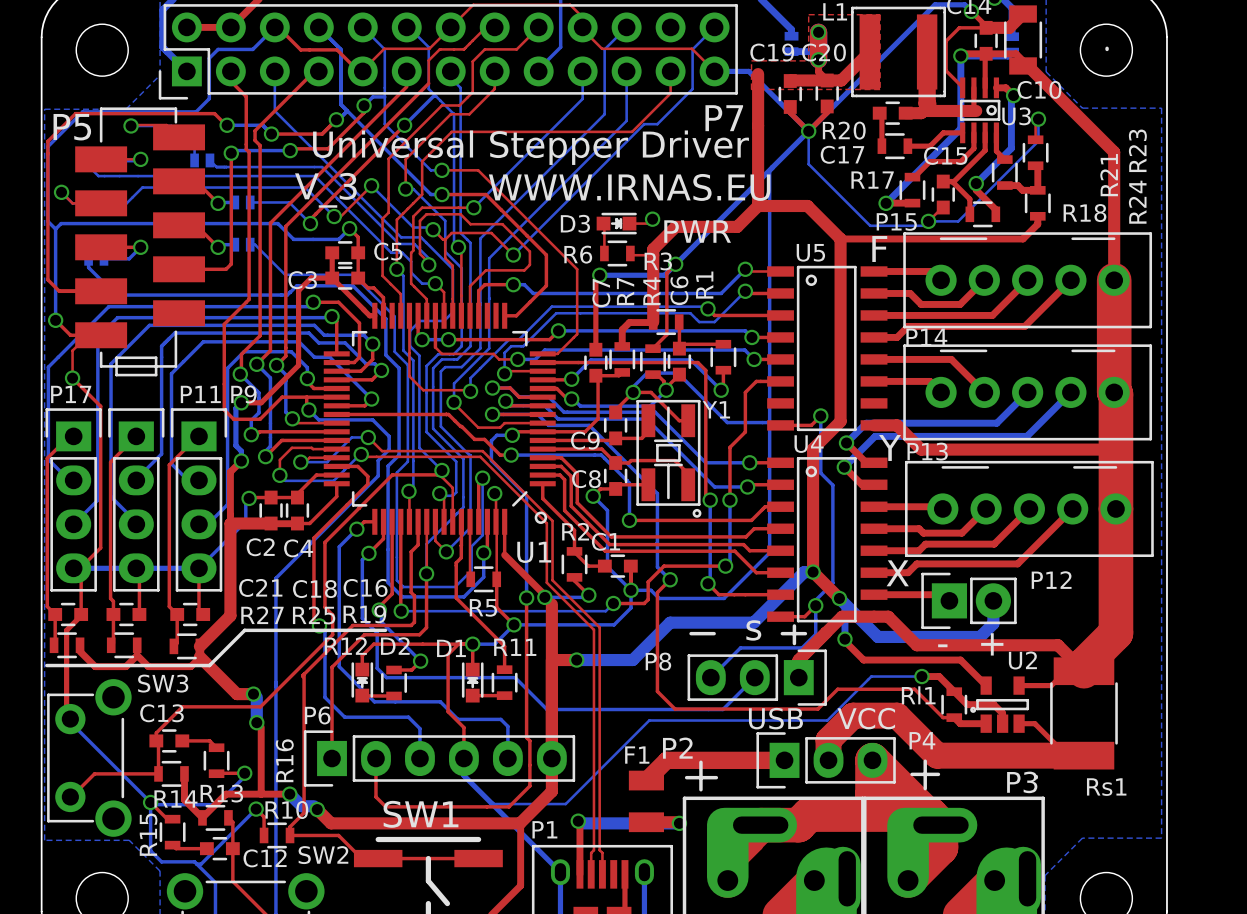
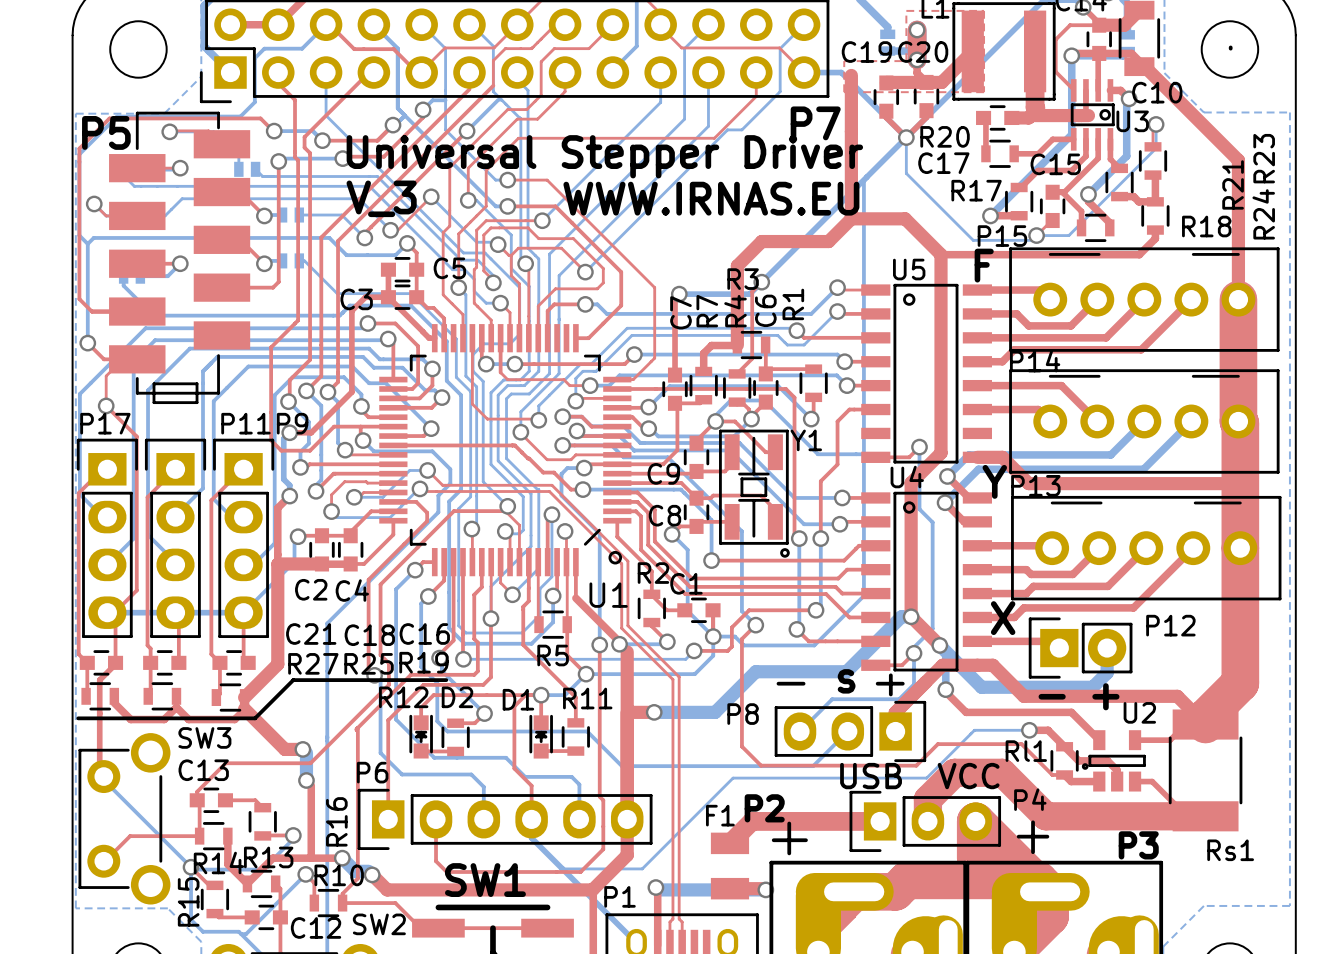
top track: (652, 219) (648, 223) (629, 223) -> none
via: (652, 219) -> none
top track: (603, 223) (604, 253) -> none
D3: (616, 223) -> none
text: PWR (697, 231) -> none
R6: (617, 253) -> none
top track: (630, 253) (632, 255) (653, 255) -> none

